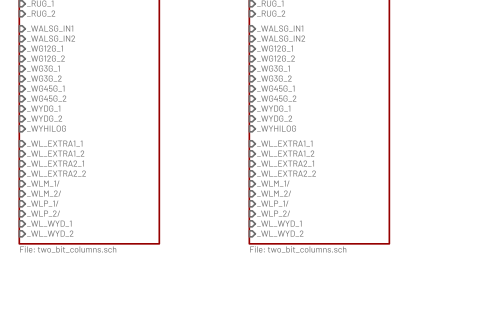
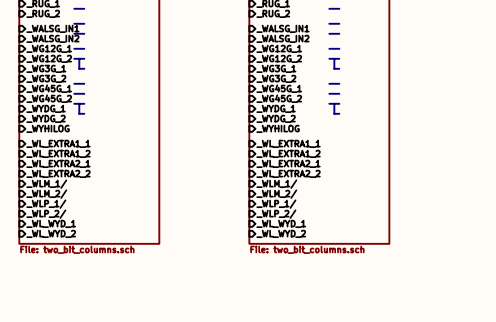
wire: none -> (74, 8) (84, 8)
wire: none -> (329, 8) (339, 8)
wire: none -> (74, 23) (84, 23)
wire: none -> (329, 23) (339, 23)
wire: none -> (74, 33) (84, 33)
wire: none -> (329, 33) (339, 33)
wire: none -> (74, 48) (84, 48)
wire: none -> (329, 48) (339, 48)
wire: none -> (74, 58) (84, 58)
wire: none -> (79, 58) (79, 68) (84, 68)
wire: none -> (329, 58) (339, 58)
wire: none -> (334, 58) (334, 68) (339, 68)
wire: none -> (74, 83) (84, 83)
wire: none -> (329, 83) (339, 83)
wire: none -> (74, 93) (84, 93)
wire: none -> (329, 93) (339, 93)
wire: none -> (74, 103) (84, 103)
wire: none -> (79, 103) (79, 113) (84, 113)
wire: none -> (329, 103) (339, 103)
wire: none -> (334, 103) (334, 113) (339, 113)

